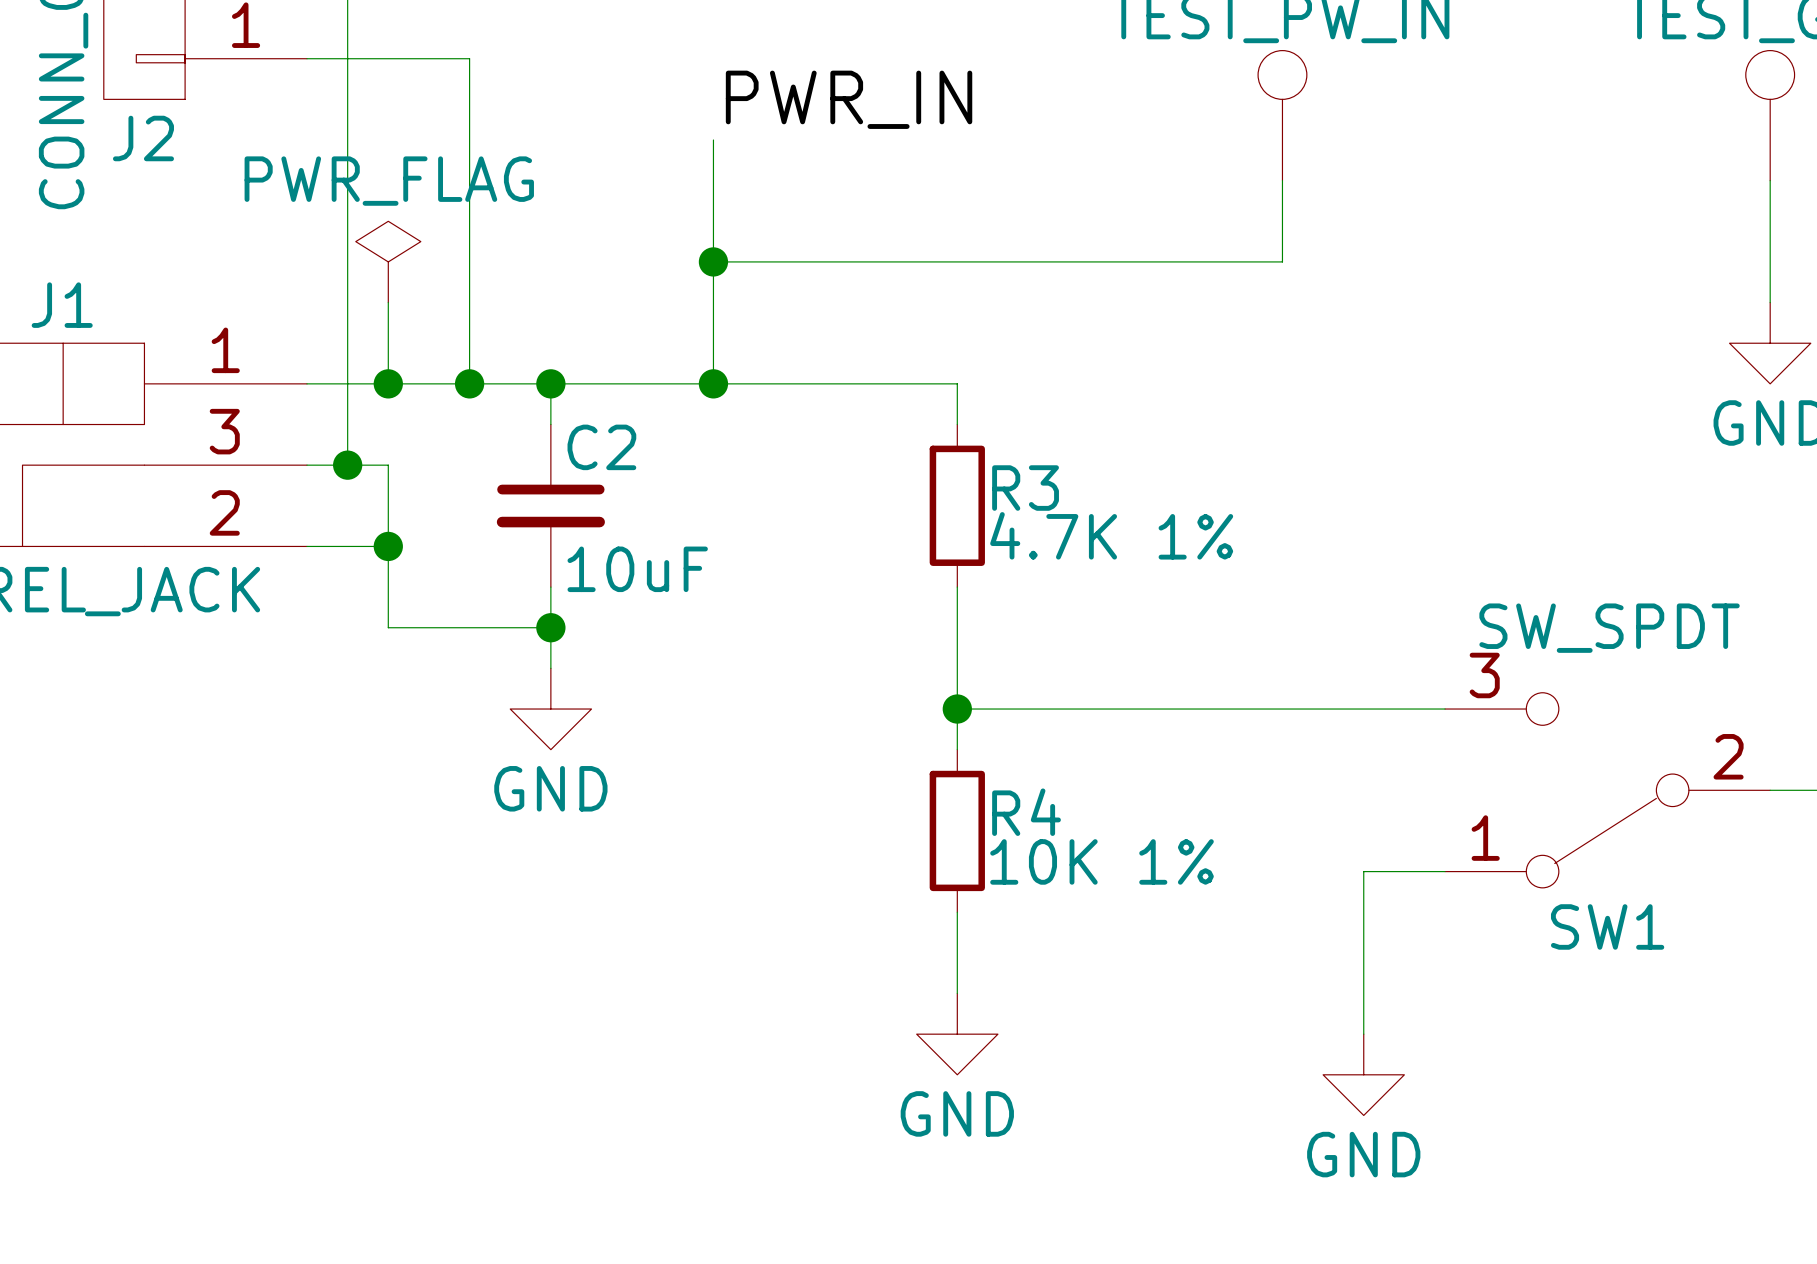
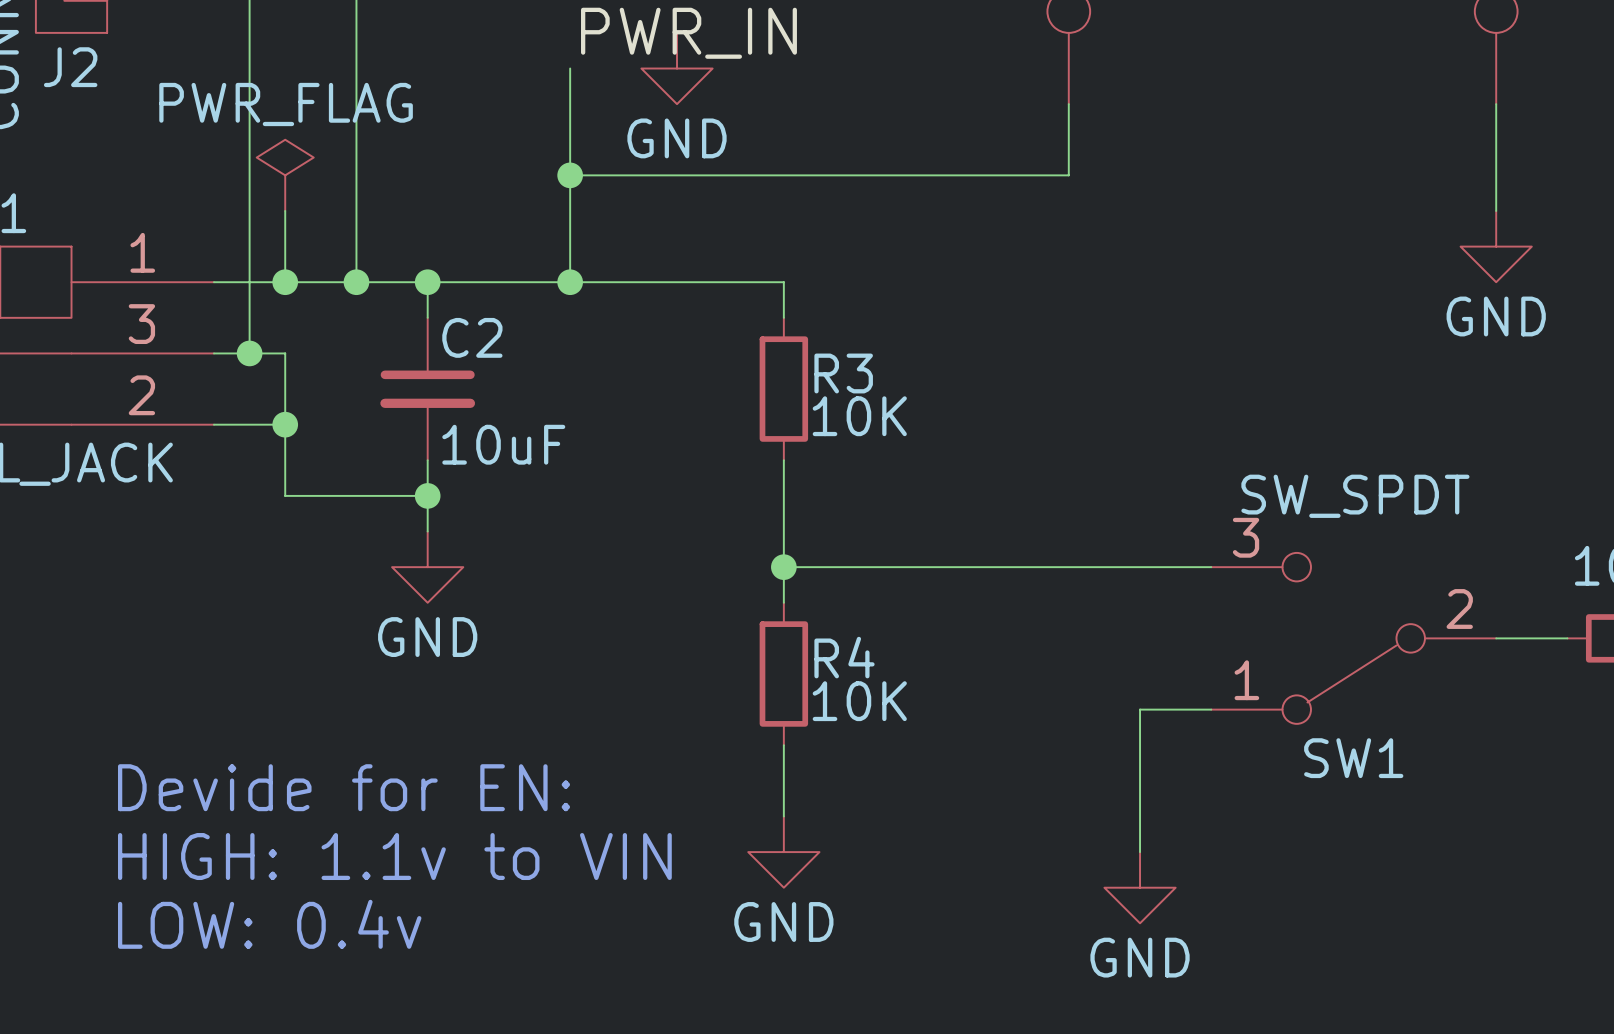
power symbol: none -> GND (677, 68)
R3 value: 4.7K 1% (1111, 535) -> 10K (859, 416)
R4 value: 10K 1% (1102, 861) -> 10K (859, 701)
text: none -> Devide for EN: (344, 787)
text: none -> HIGH: 1.1v to VIN (394, 856)
text: none -> LOW: 0.4v (269, 924)

